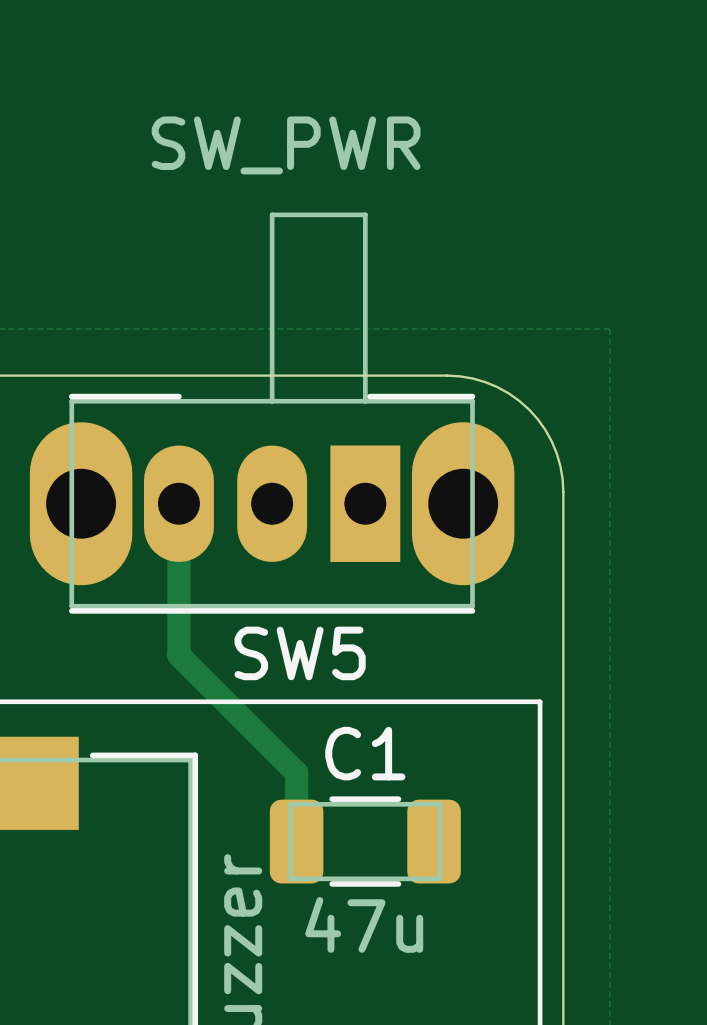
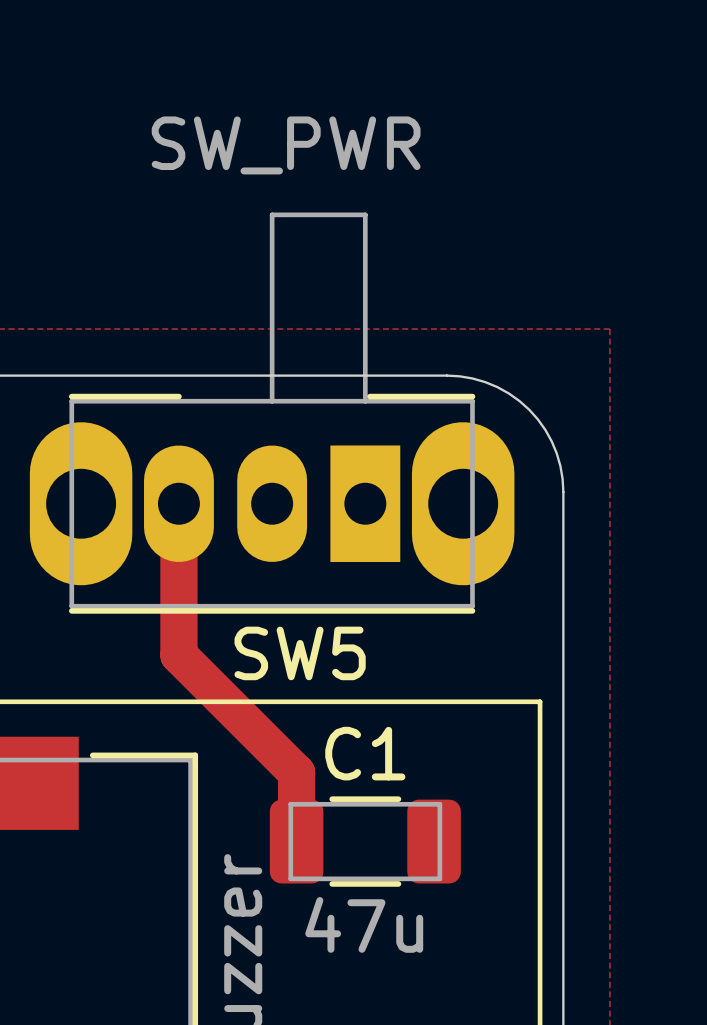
track width: thin (178, 503) (178, 655) (296, 772) (296, 841) -> thick (178, 503) (178, 655) (296, 772) (296, 841)

